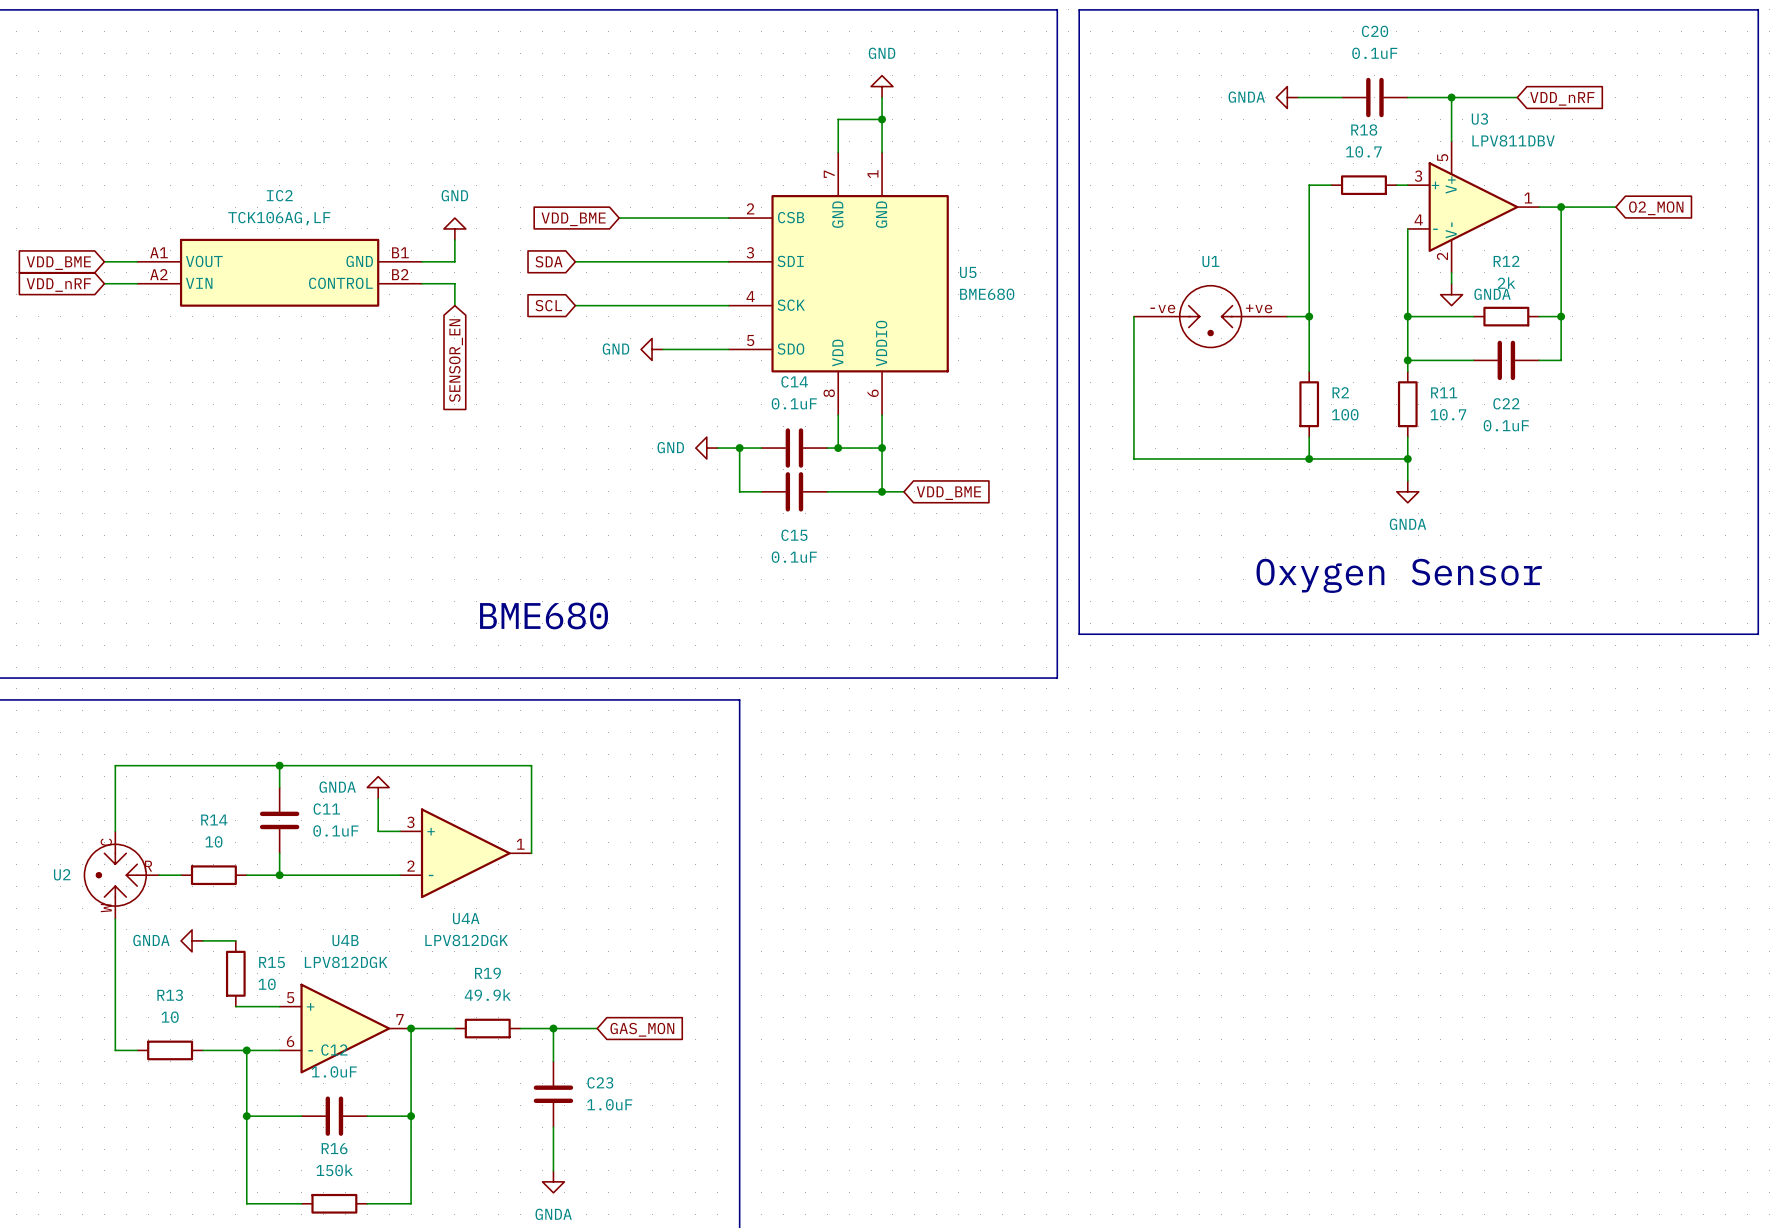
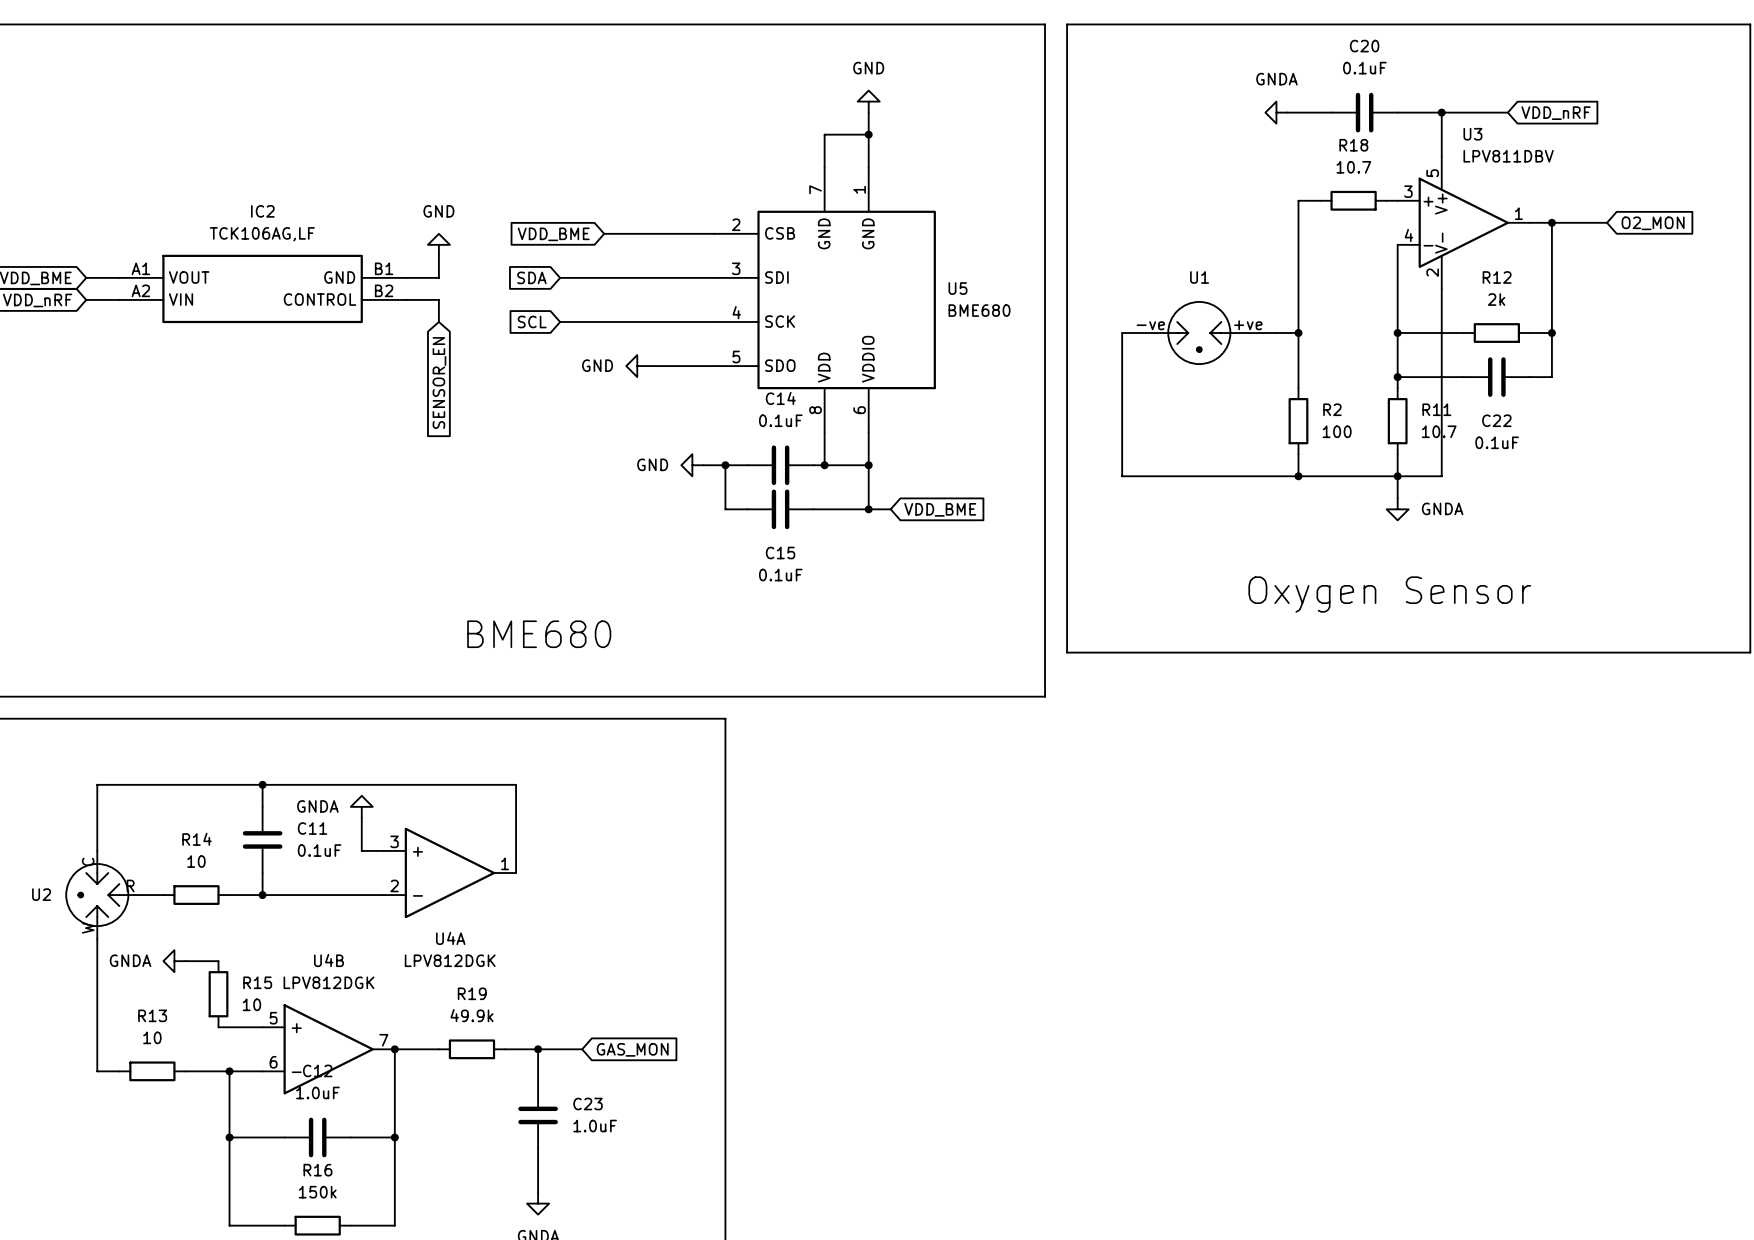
power symbol text position: GNDA (1246, 97) -> GNDA (1276, 79)
wire: none -> (1441, 299) (1441, 476) (1397, 476)
power symbol: GNDA (1451, 294) -> none
power symbol text position: GNDA (1407, 524) -> GNDA (1442, 508)

